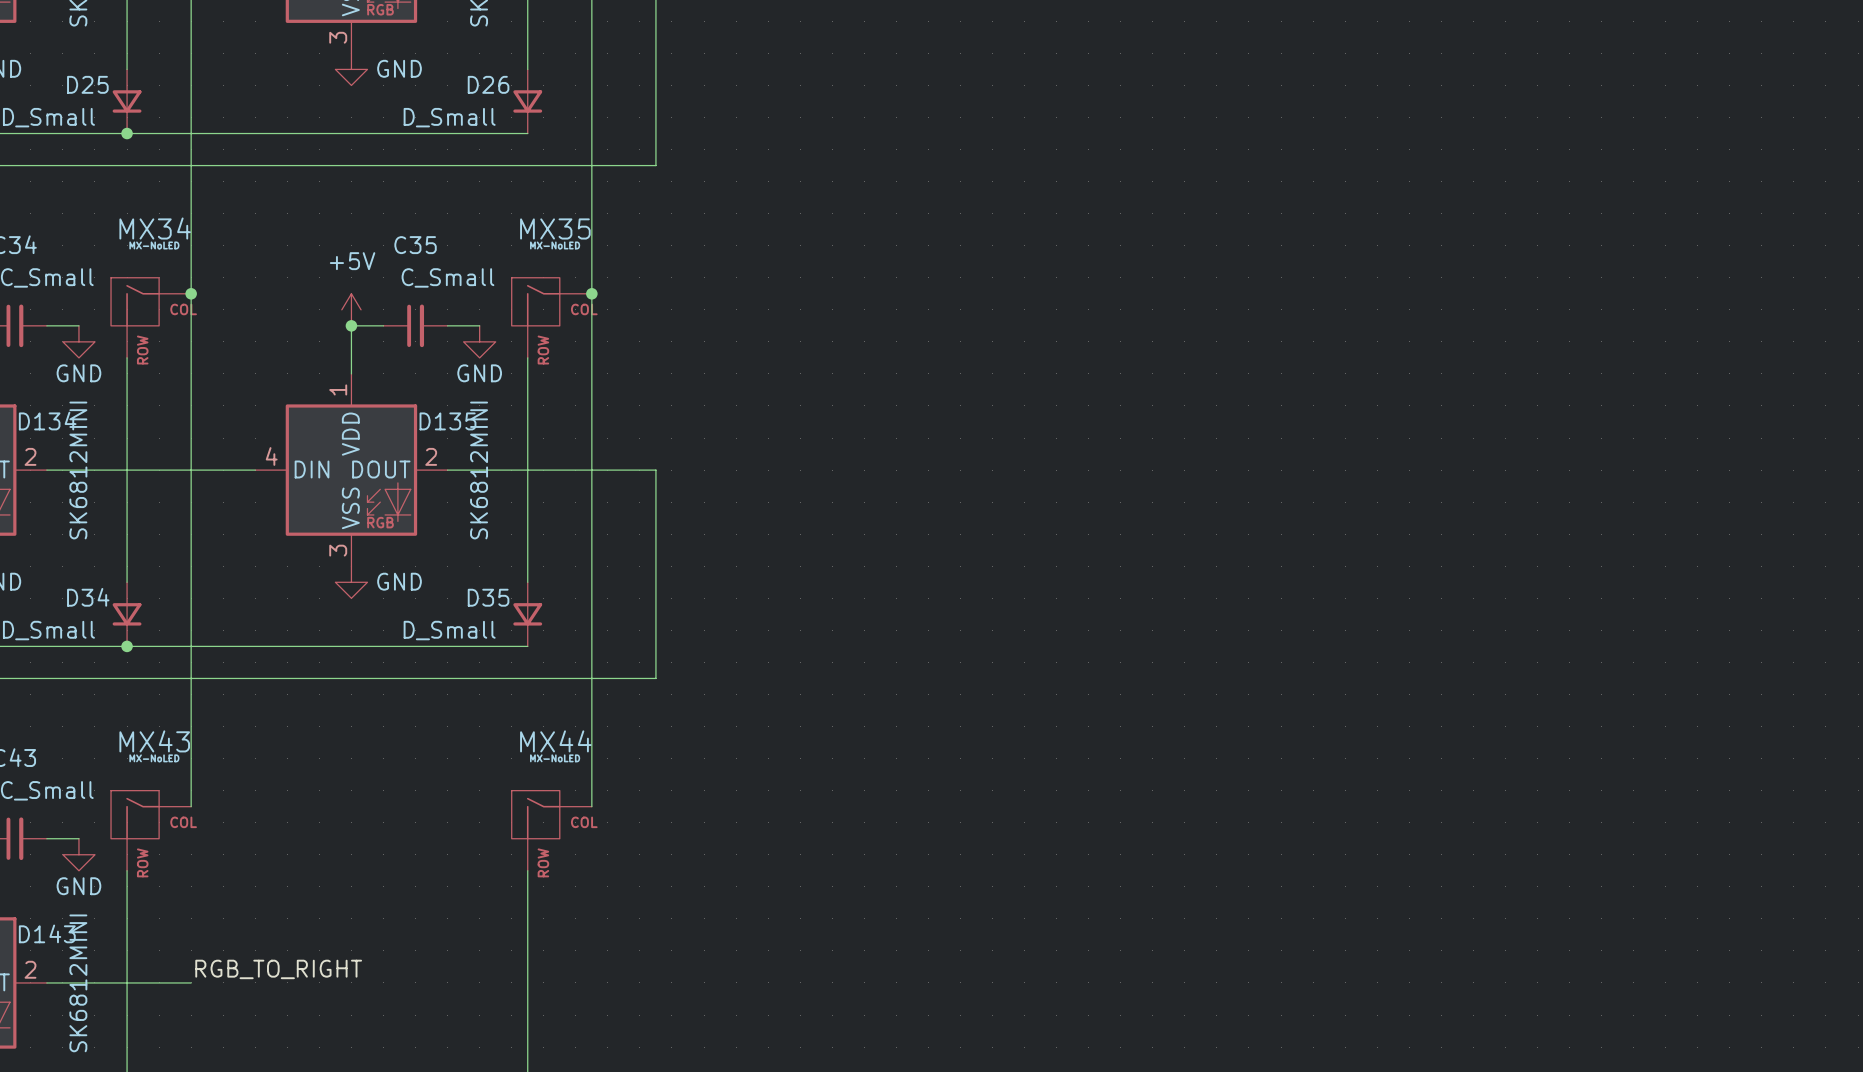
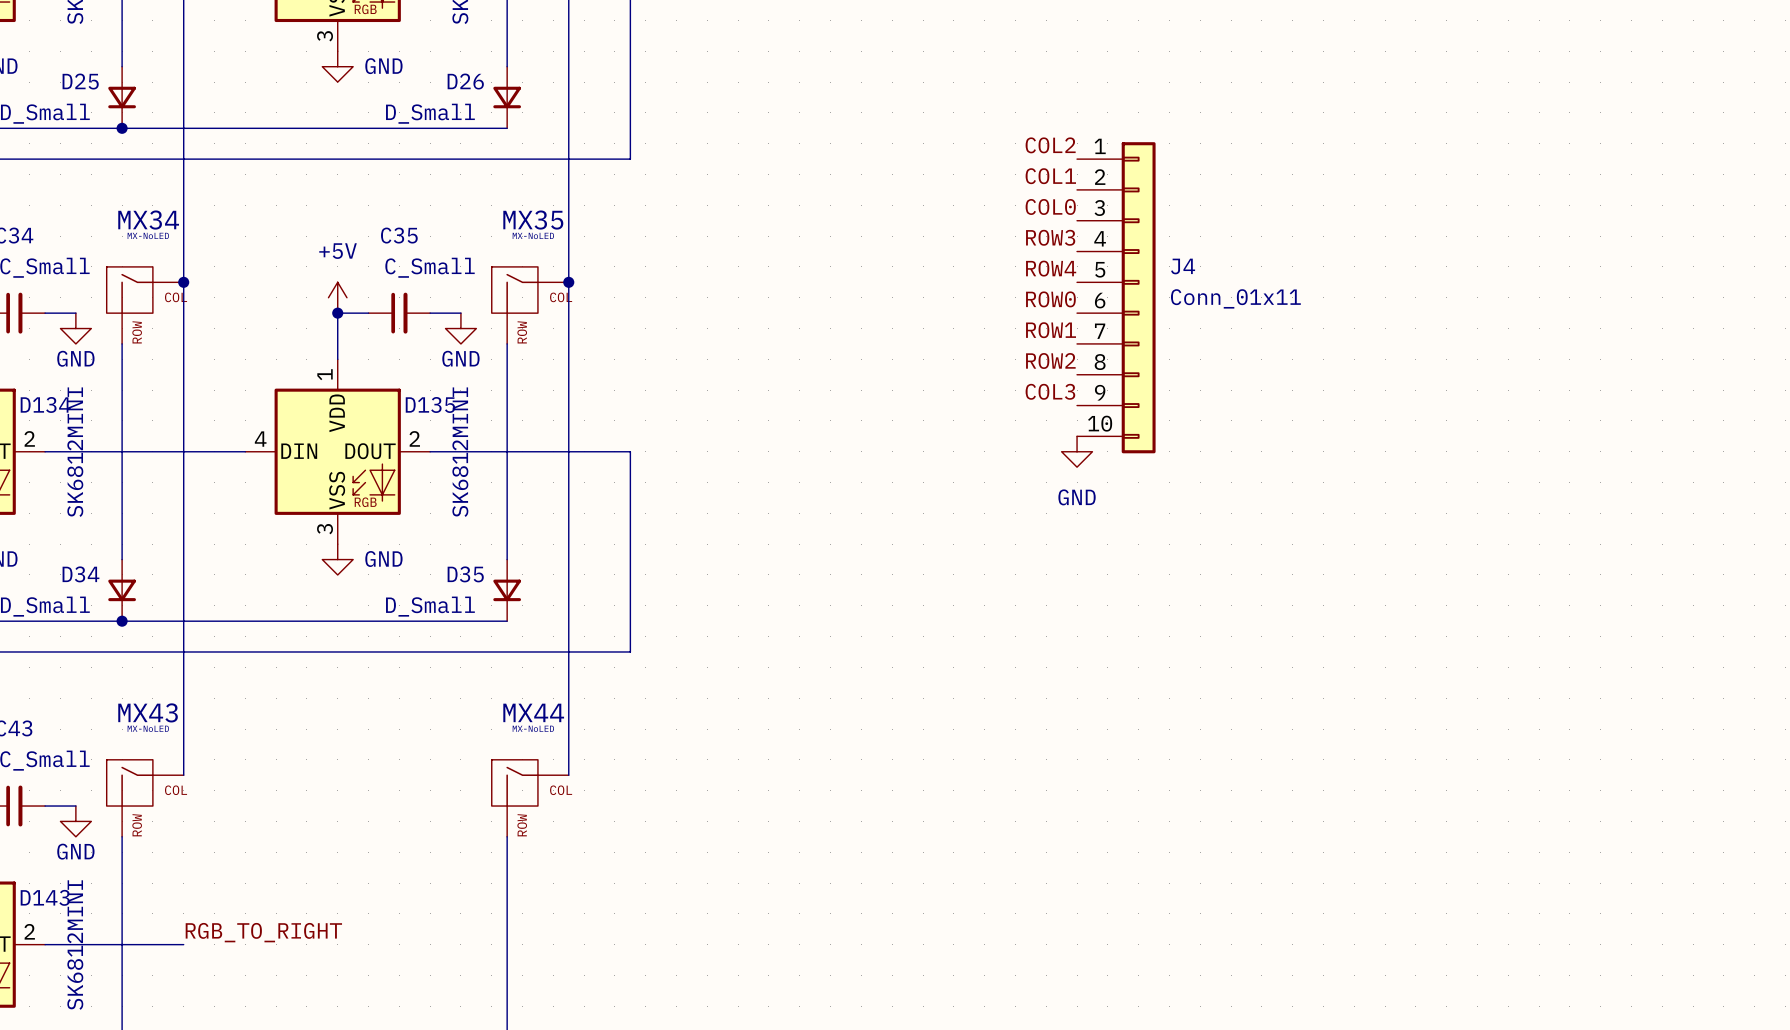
label: none -> COL2 (1050, 145)
label: none -> COL1 (1050, 176)
label: none -> COL0 (1050, 206)
label: none -> ROW3 (1050, 237)
label: none -> ROW4 (1051, 268)
J4: none -> Conn_01x11 (1116, 297)
label: none -> ROW0 (1050, 299)
label: none -> ROW1 (1051, 330)
label: none -> ROW2 (1050, 361)
label: none -> COL3 (1050, 391)
power symbol: none -> GND (1077, 451)

